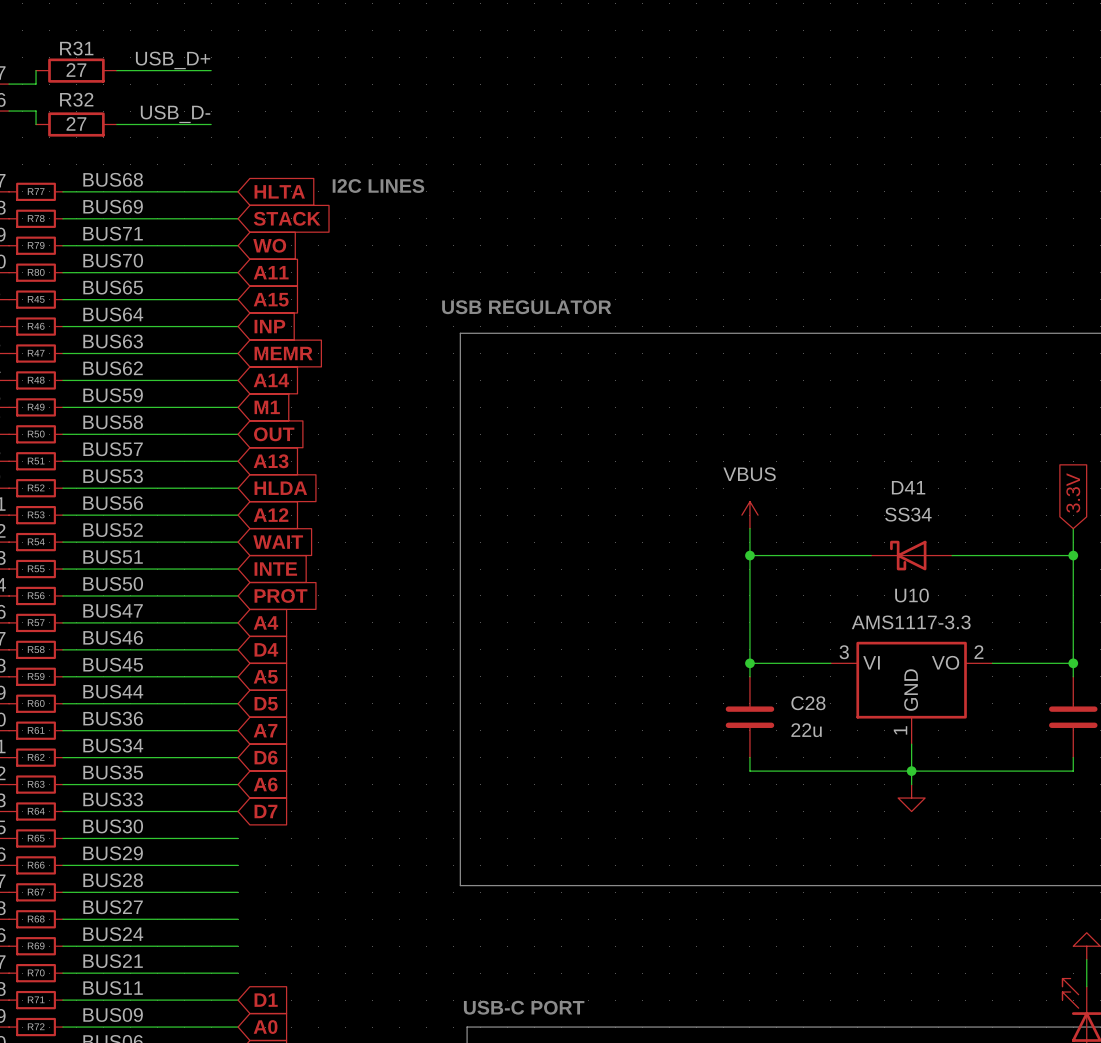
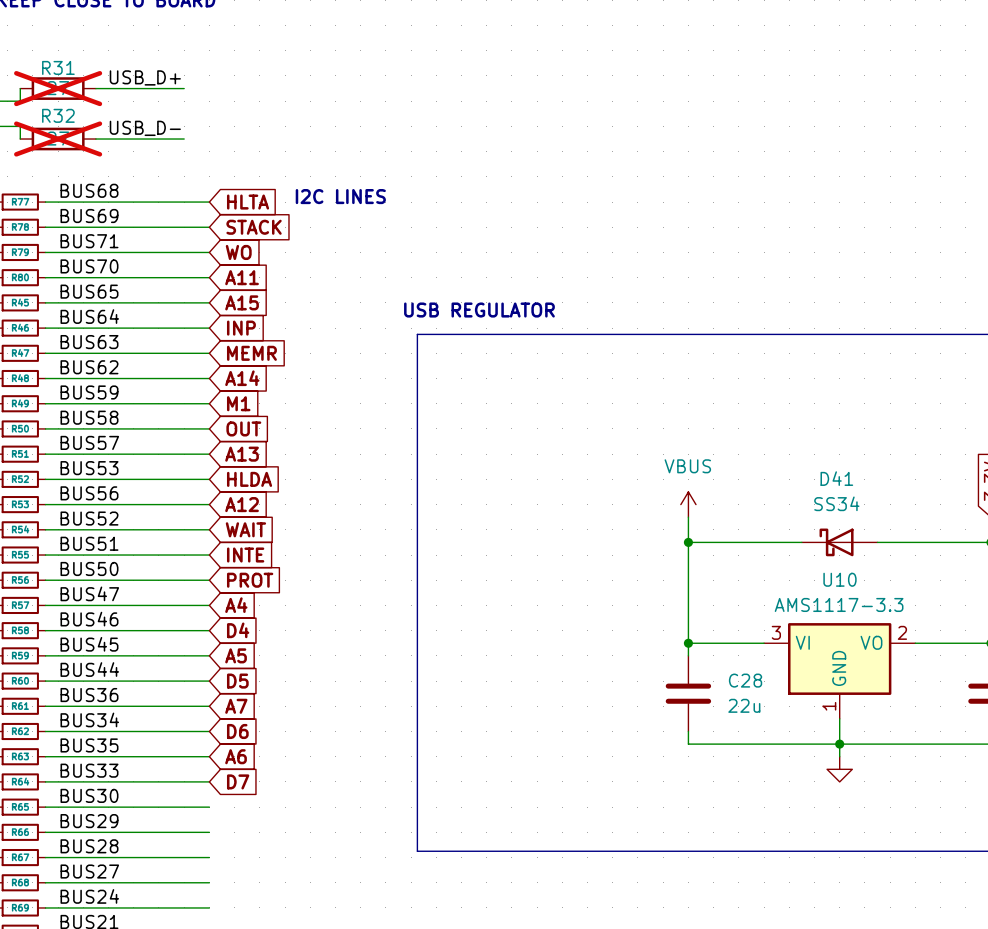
R31 do-not-place cross: none -> (58, 88)
R32 do-not-place cross: none -> (58, 139)

